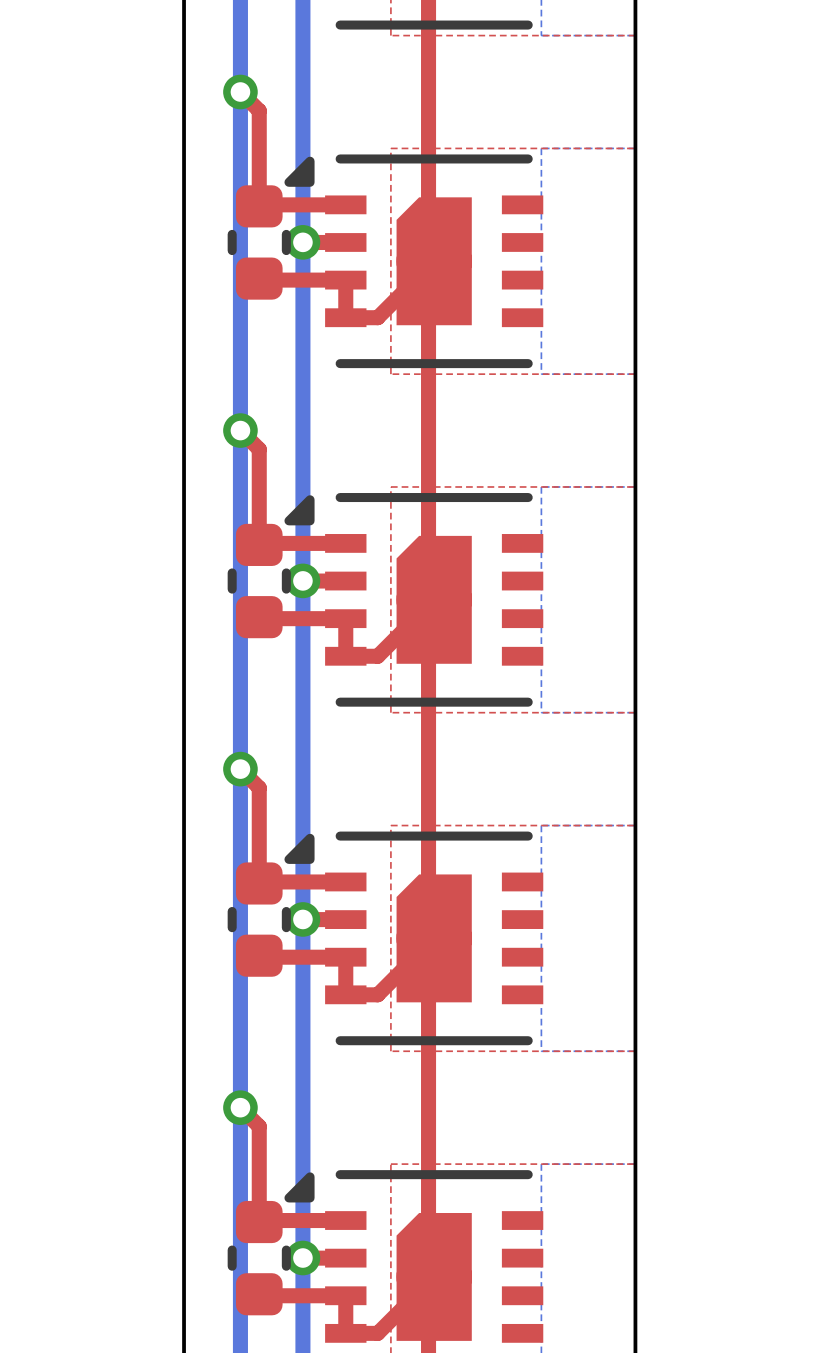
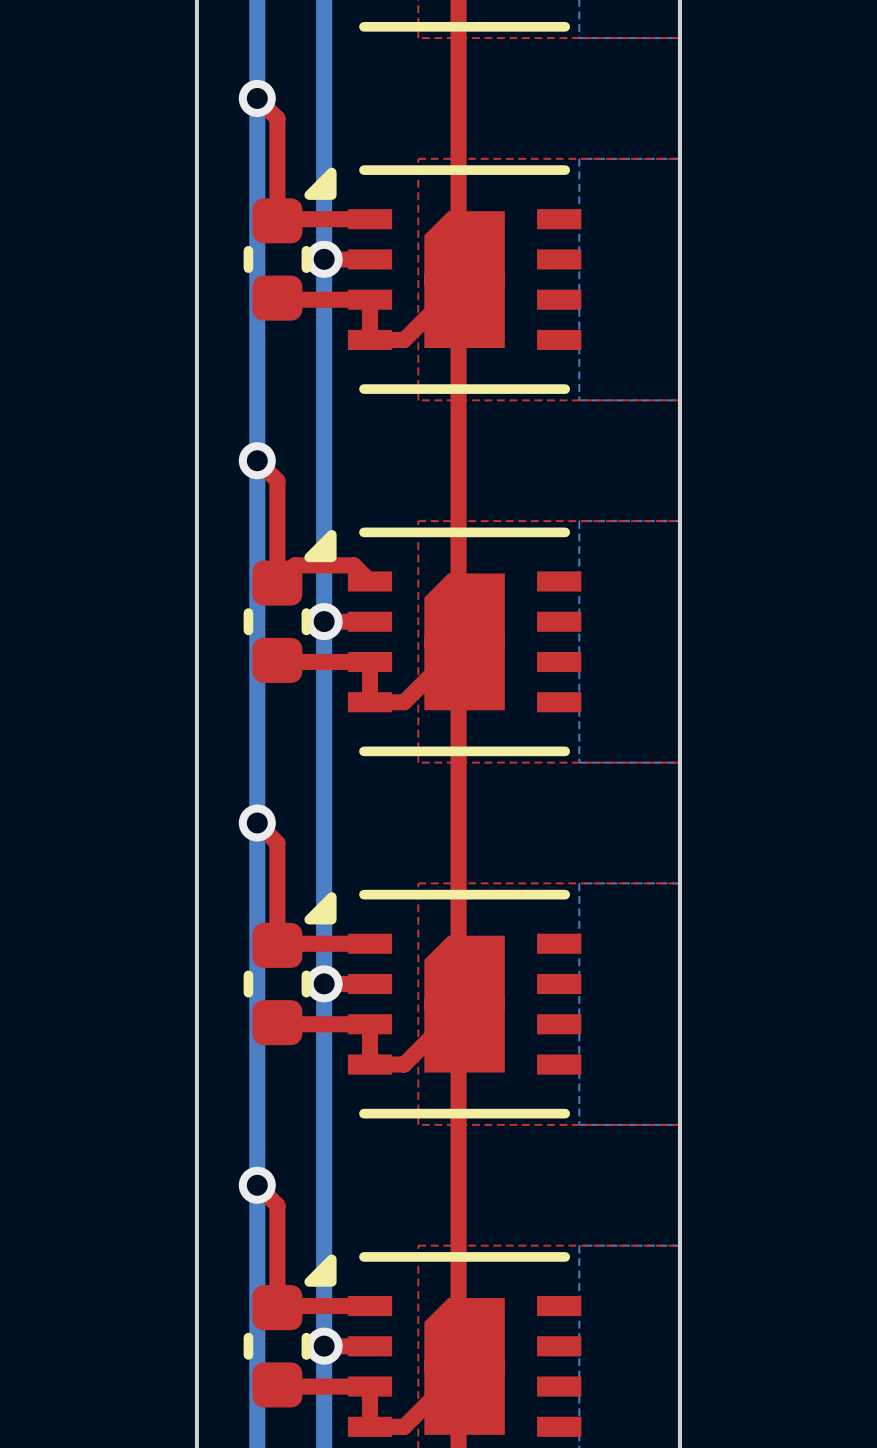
top track: (260, 543) (345, 543) -> (279, 581) (295, 565) (353, 565) (370, 581)

